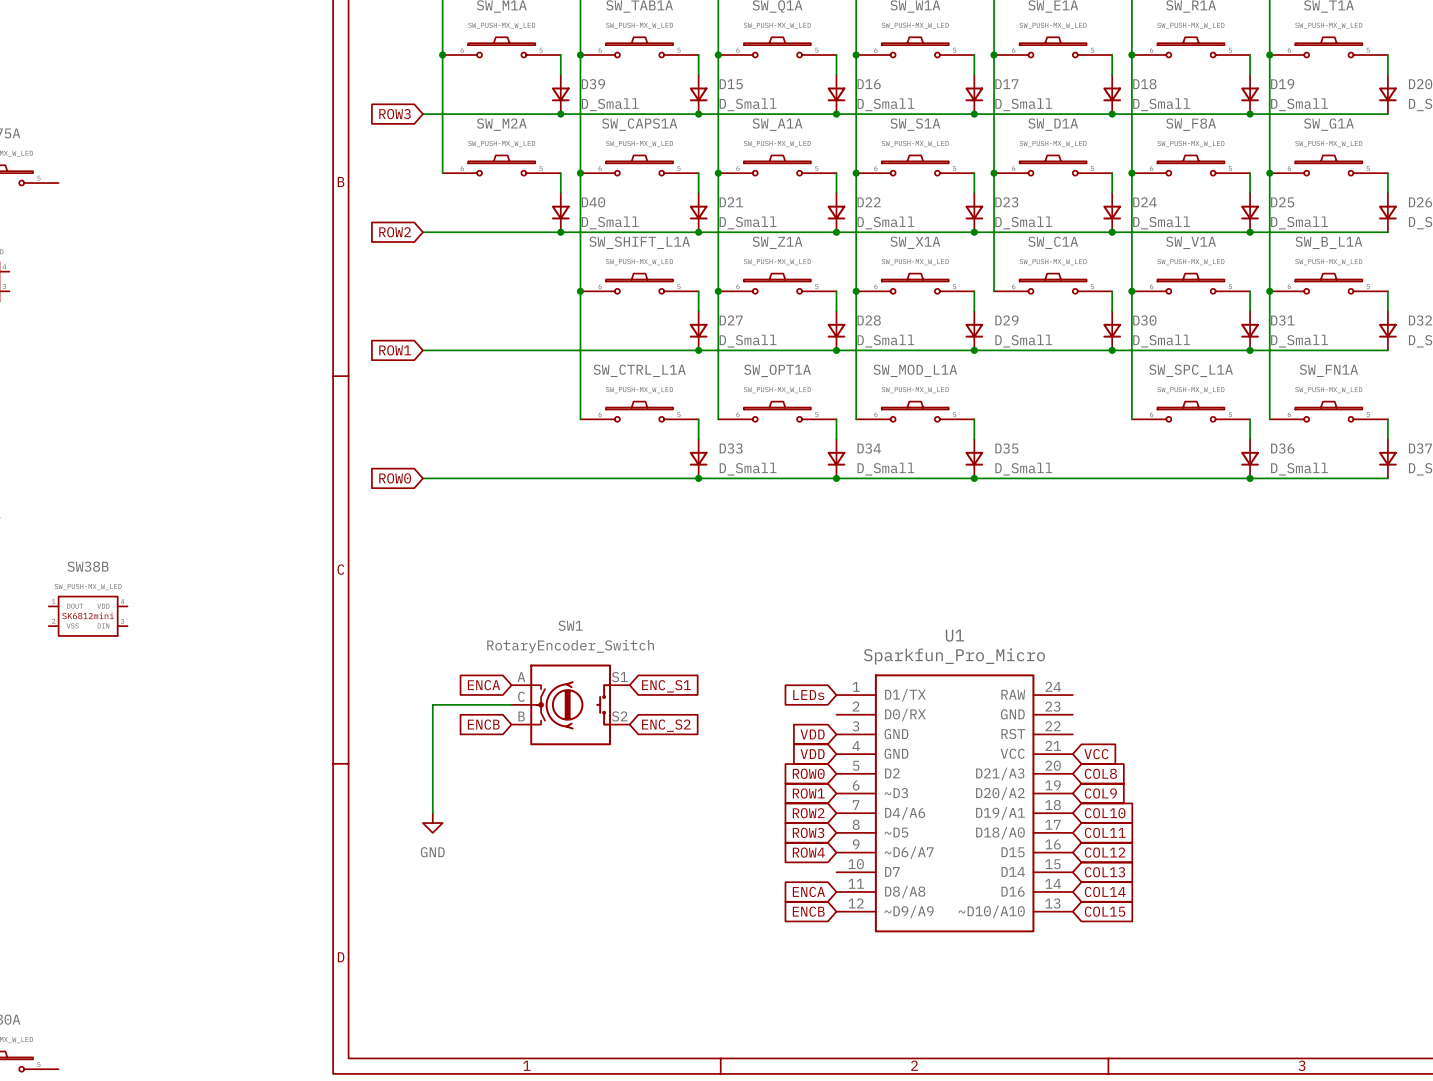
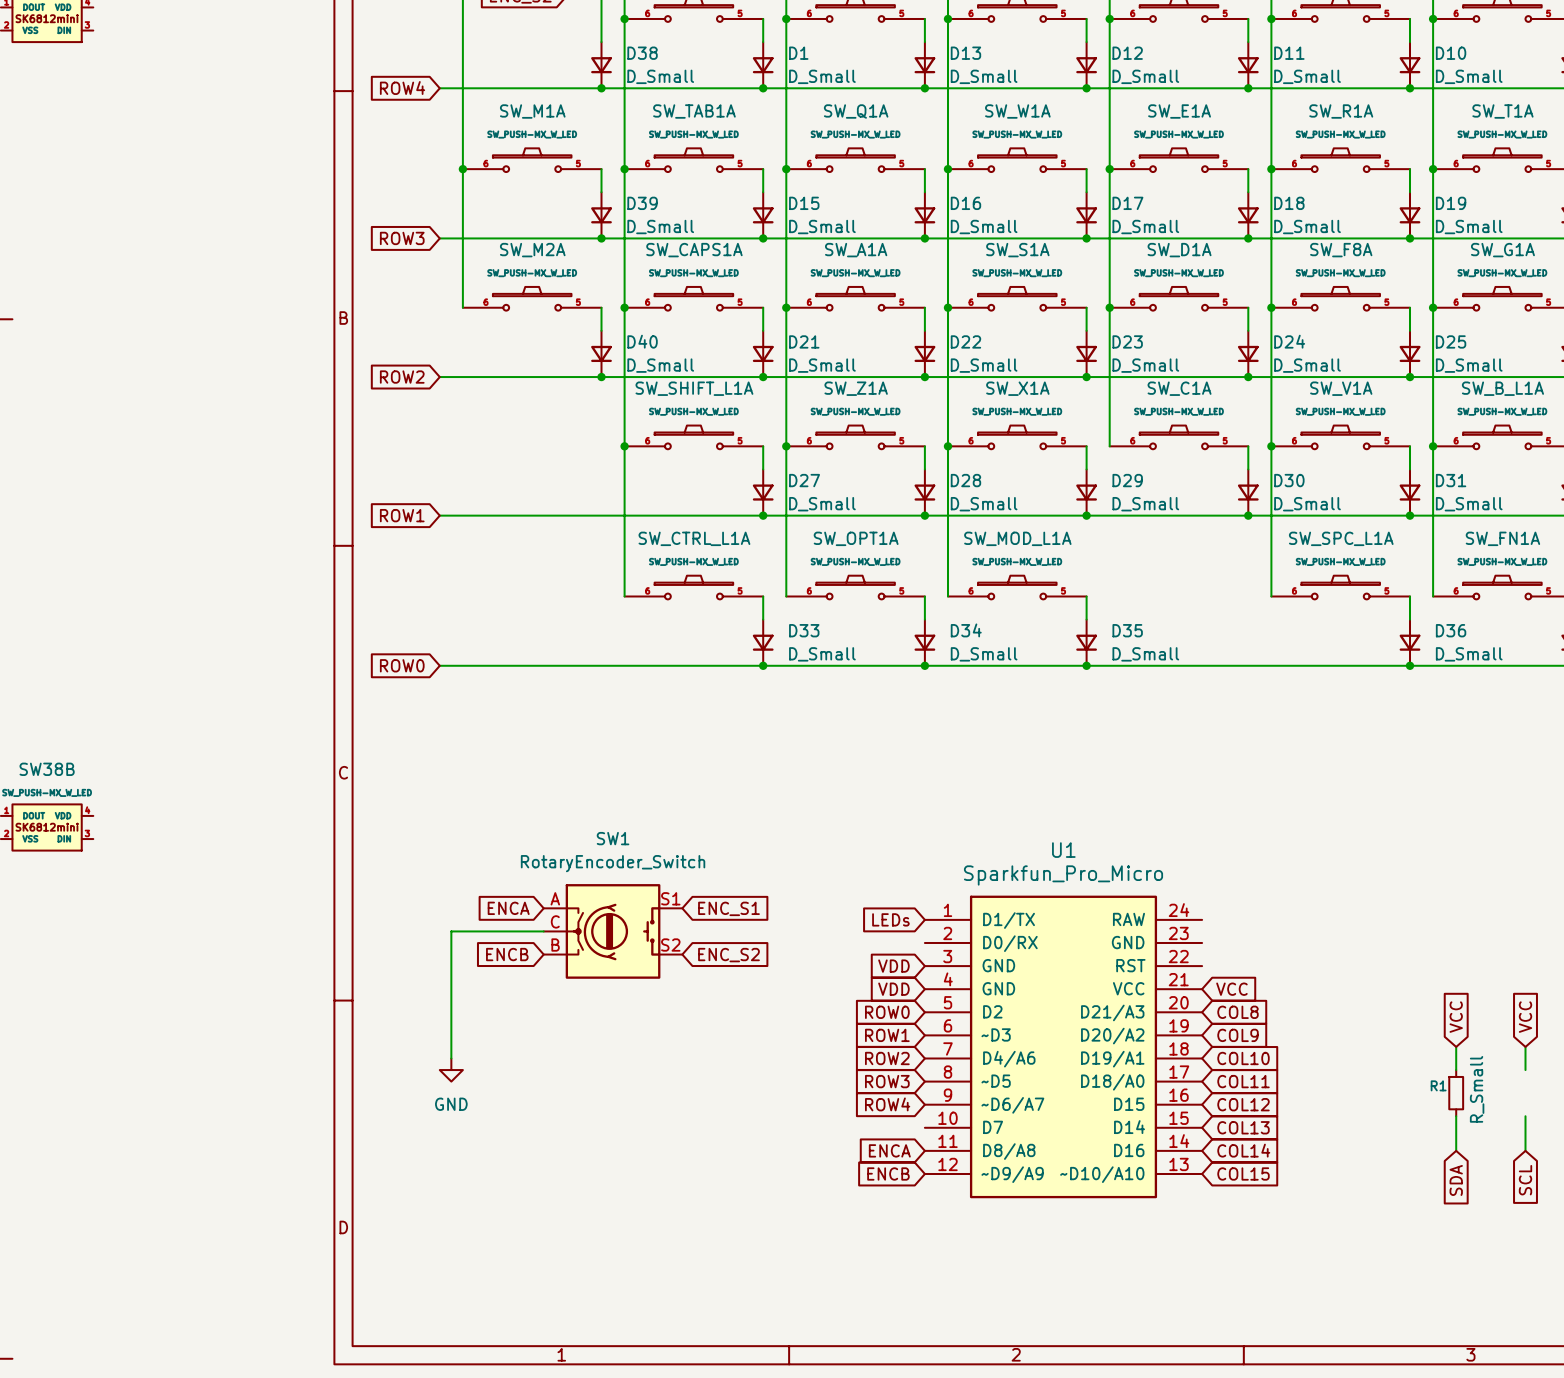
global label: none -> VCC (1456, 1017)
global label: none -> VCC (1525, 1017)
wire: none -> (1456, 1046) (1456, 1070)
wire: none -> (1525, 1046) (1525, 1070)
R1: none -> R_Small (1456, 1093)
wire: none -> (1456, 1116) (1456, 1150)
wire: none -> (1525, 1116) (1525, 1150)
global label: none -> SDA (1456, 1180)
global label: none -> SCL (1525, 1180)

